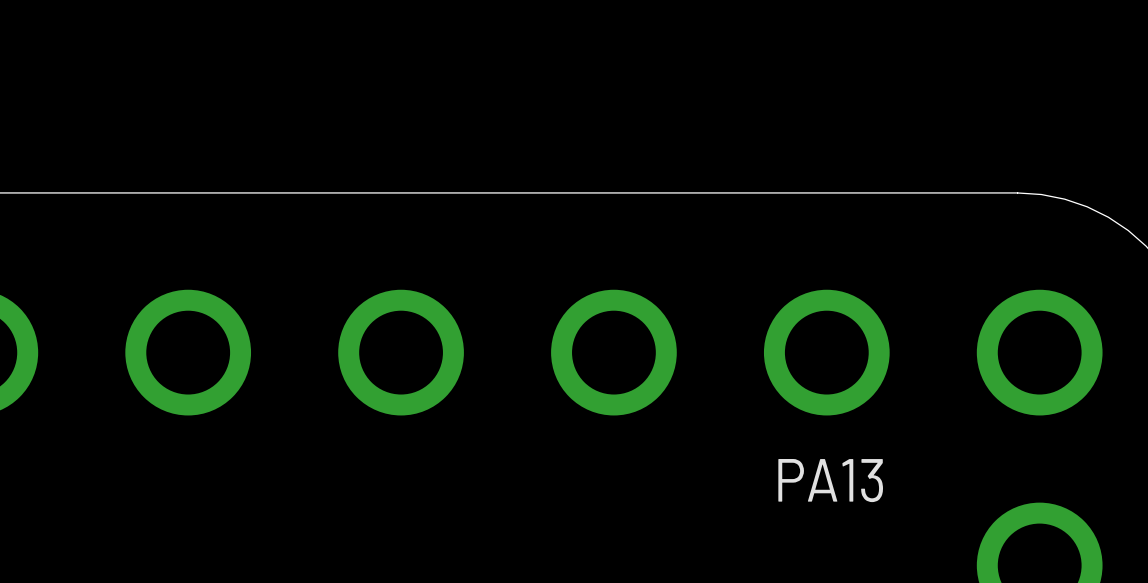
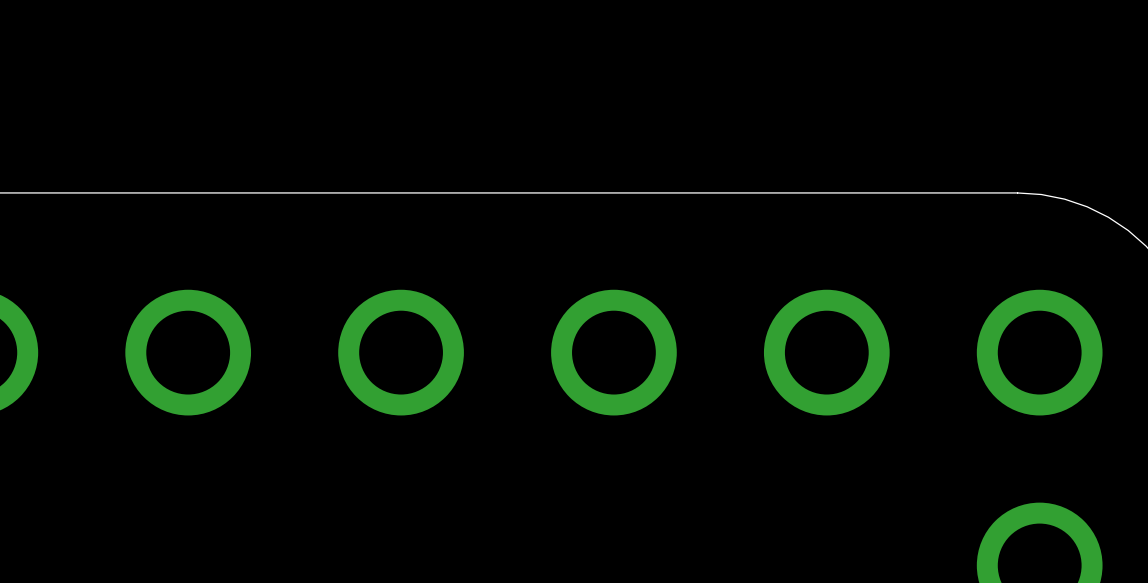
text: PA13 (830, 480) -> none

